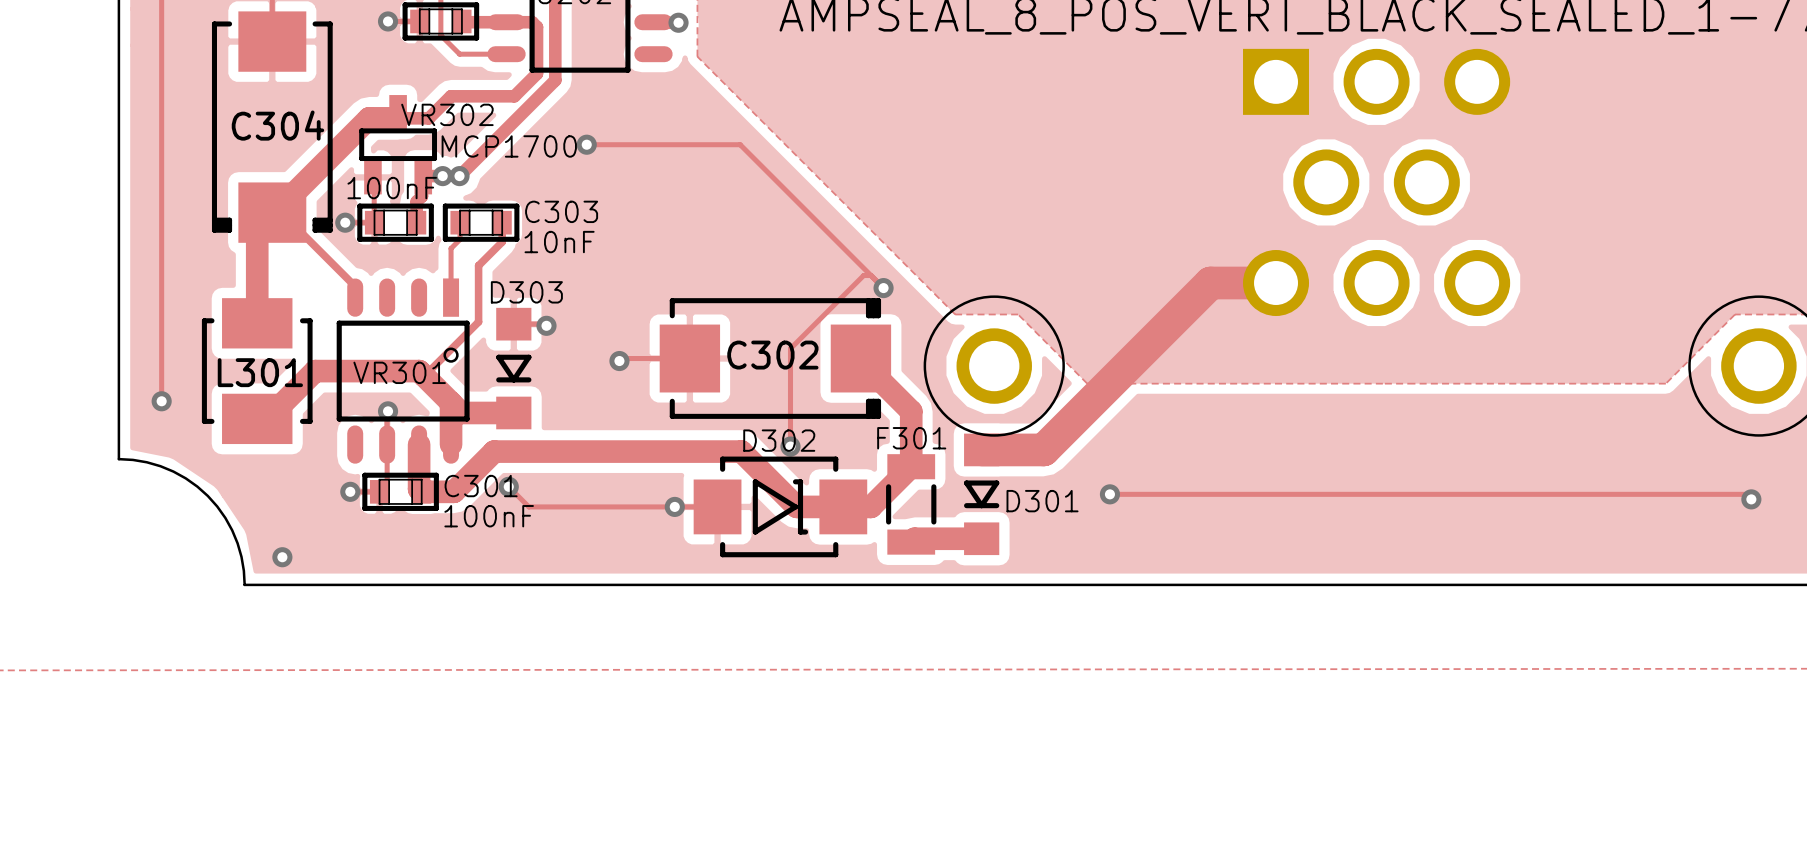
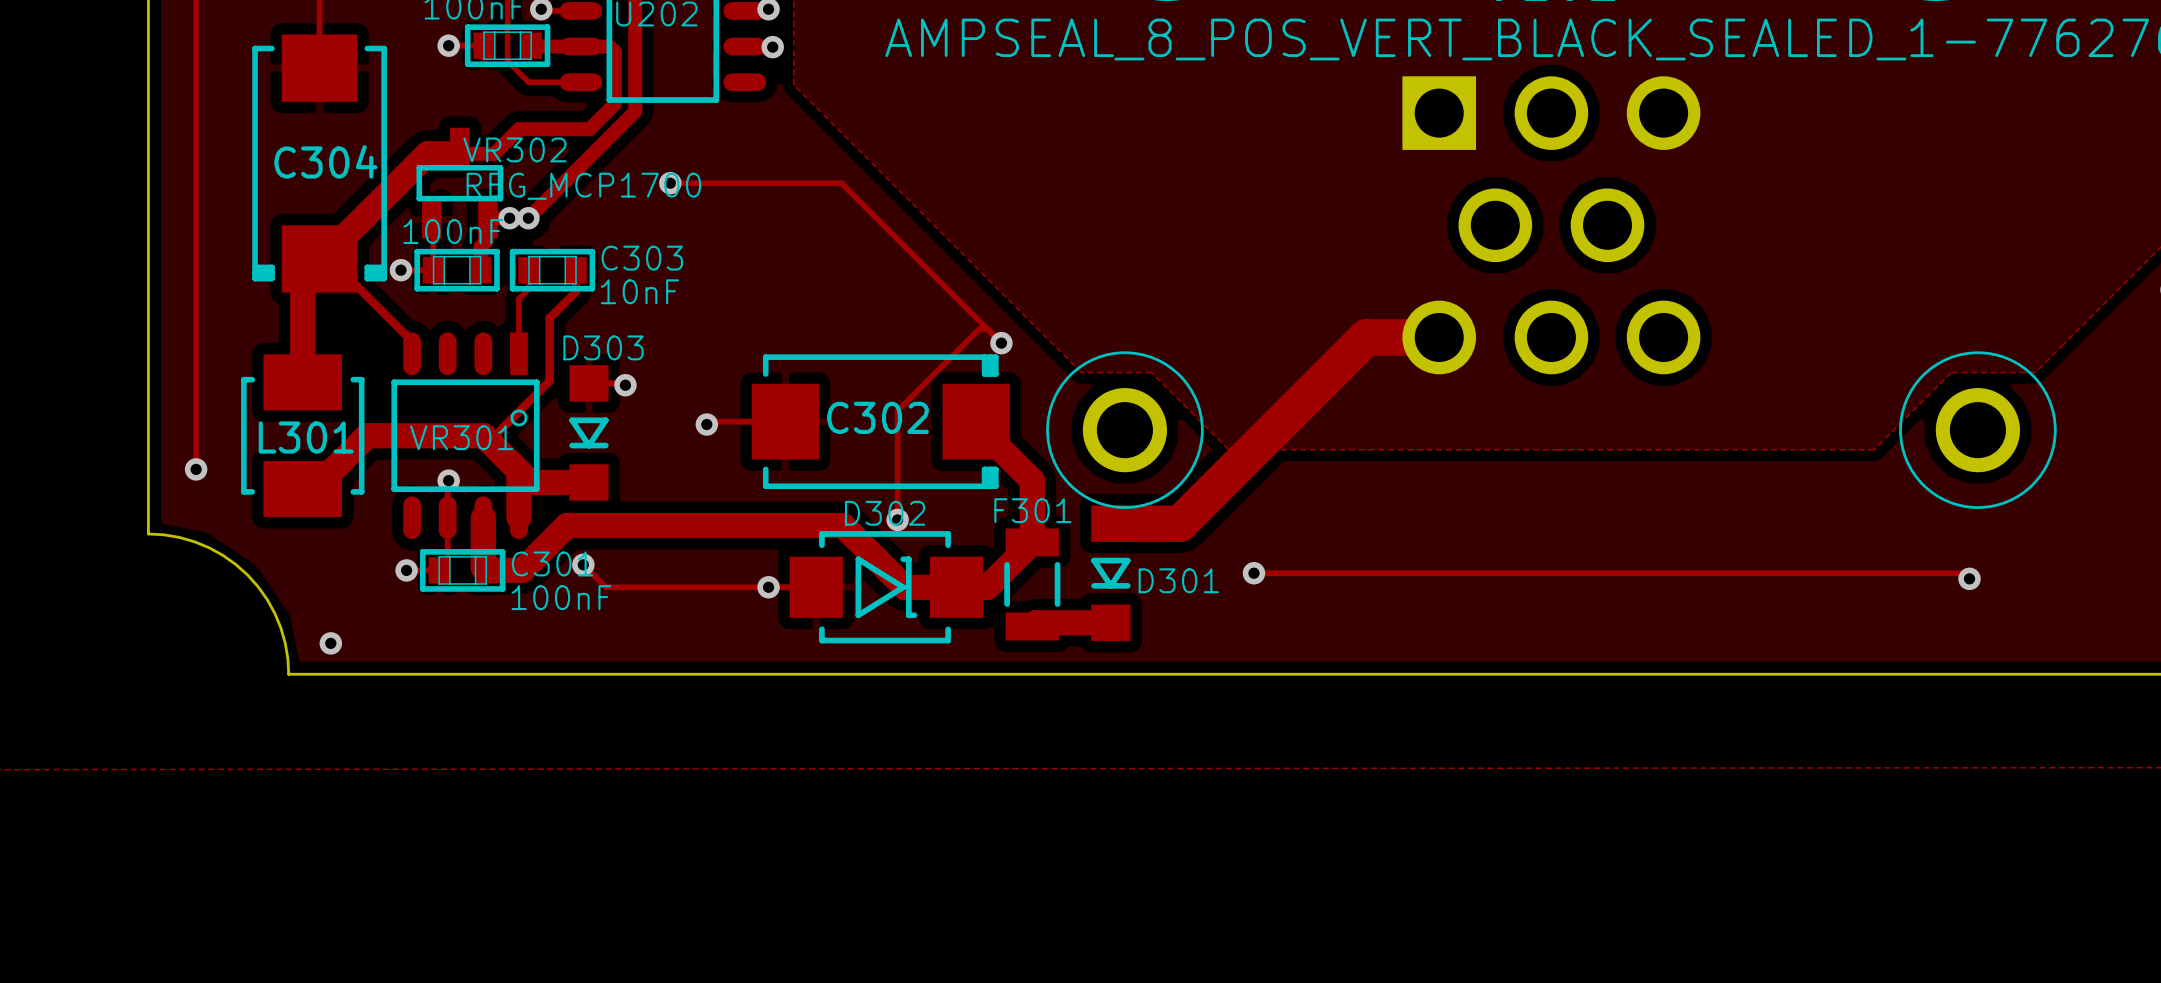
VR302 value: MCP1700 (509, 146) -> REG_MCP1700 (583, 186)

